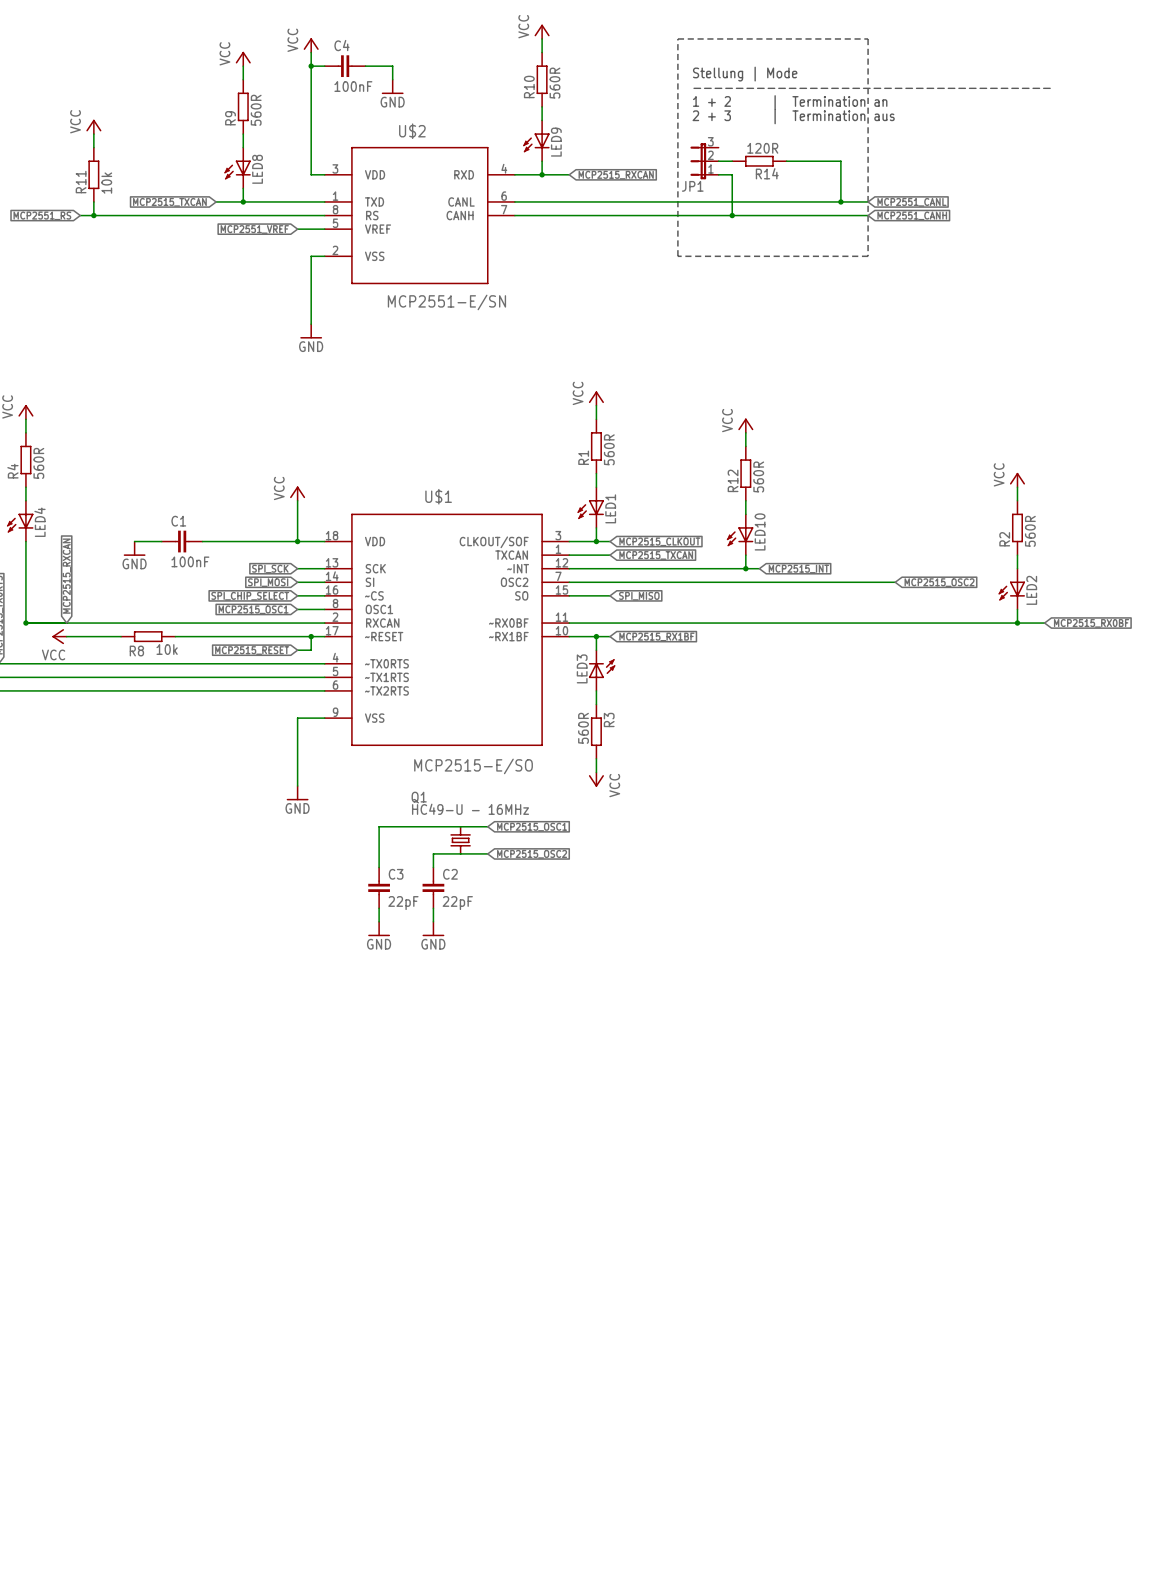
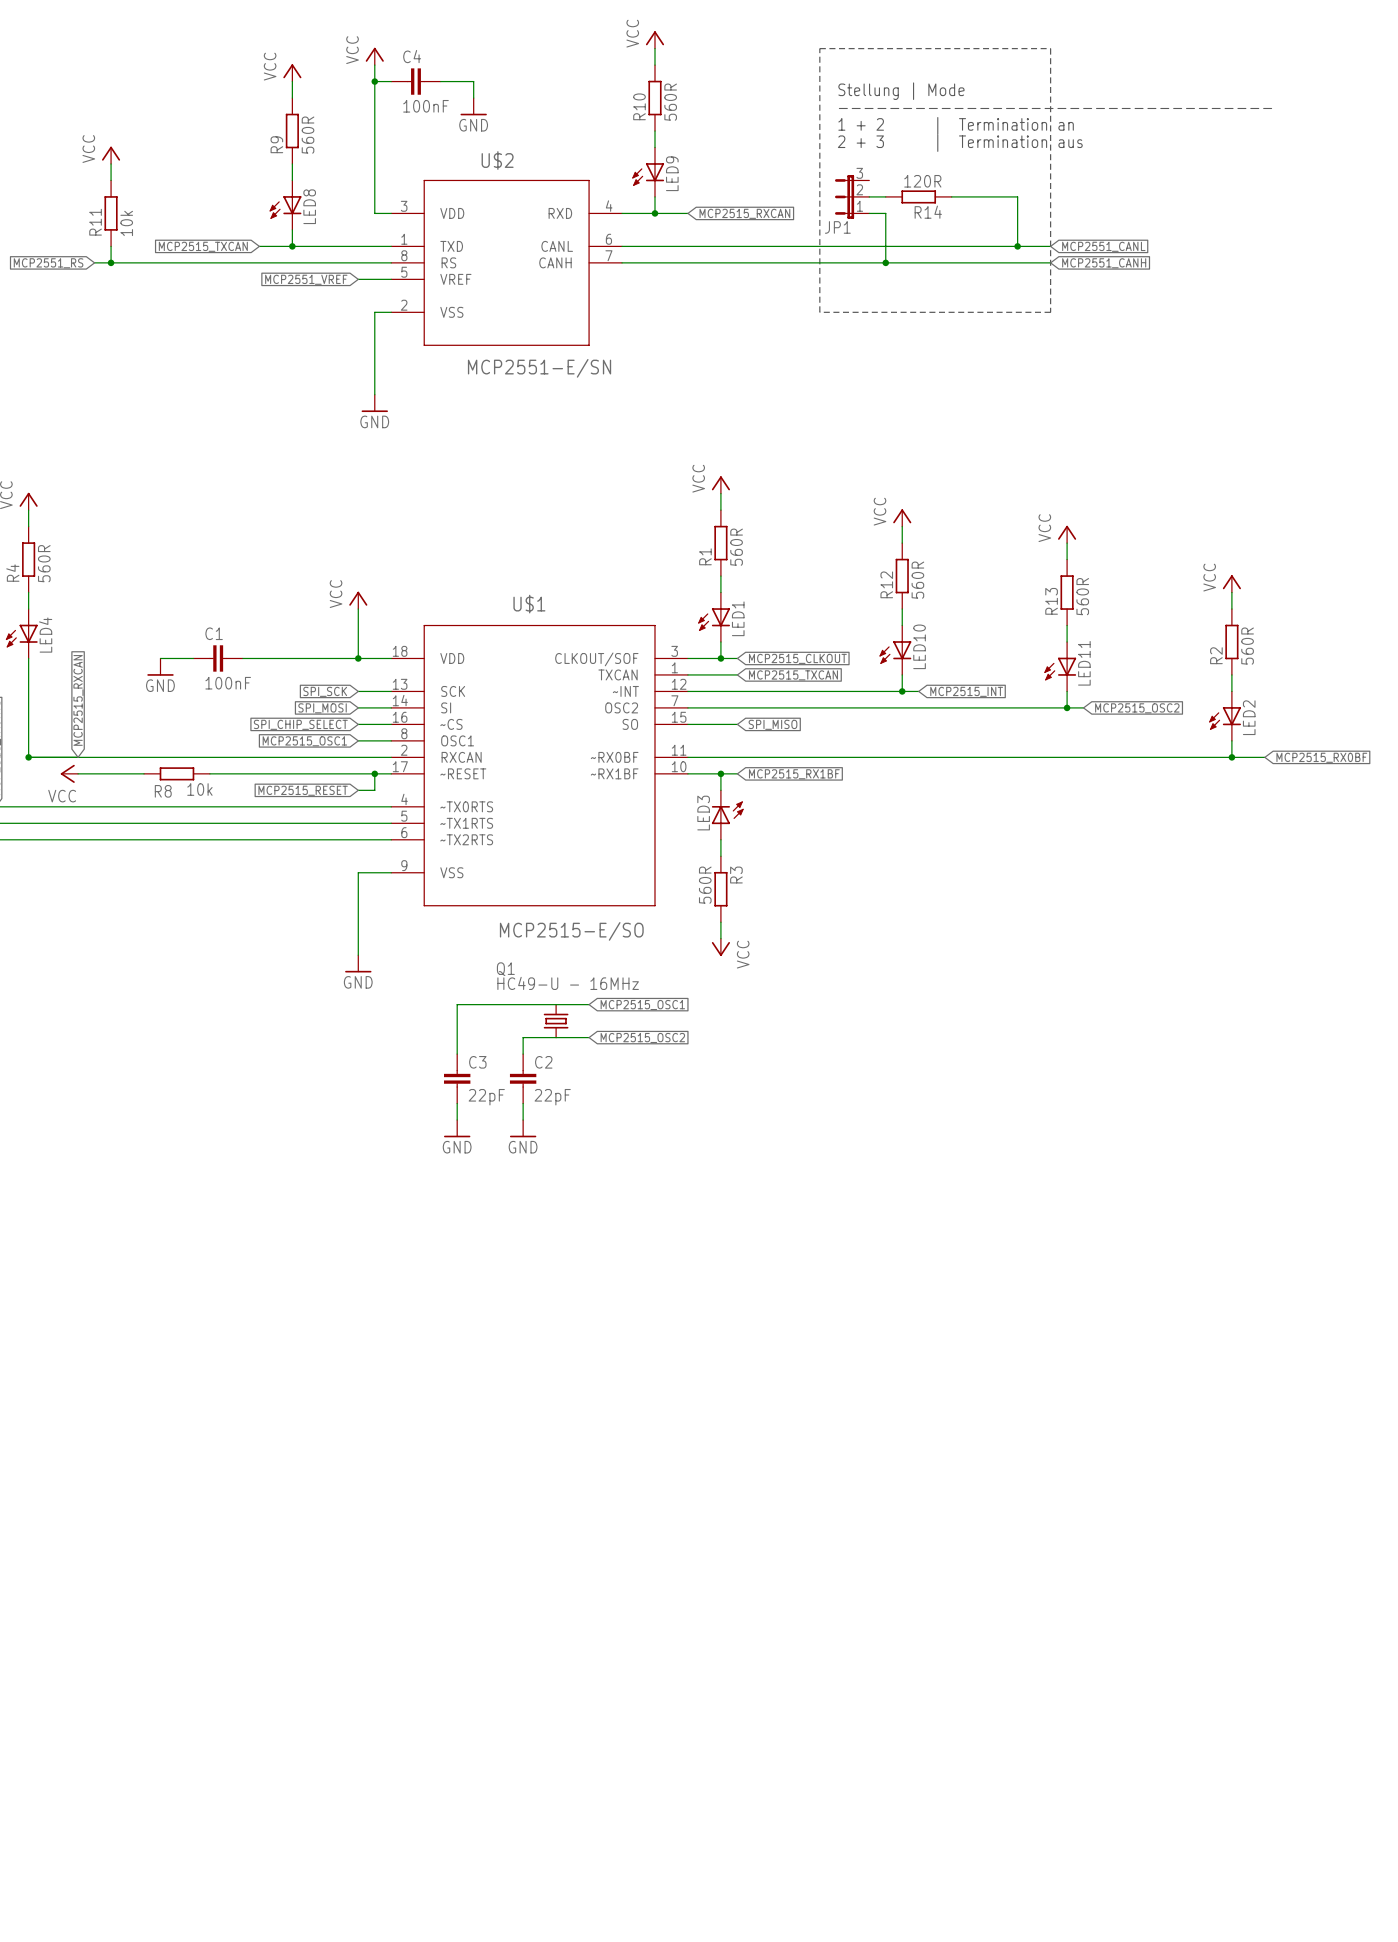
power symbol: none -> VCC (1067, 534)
wire: none -> (1067, 543) (1067, 559)
R13: none -> 560R (1067, 592)
wire: none -> (1067, 625) (1067, 641)
LED11: none -> (1060, 666)
wire: none -> (1067, 691) (1067, 707)
junction: none -> (1067, 707)

